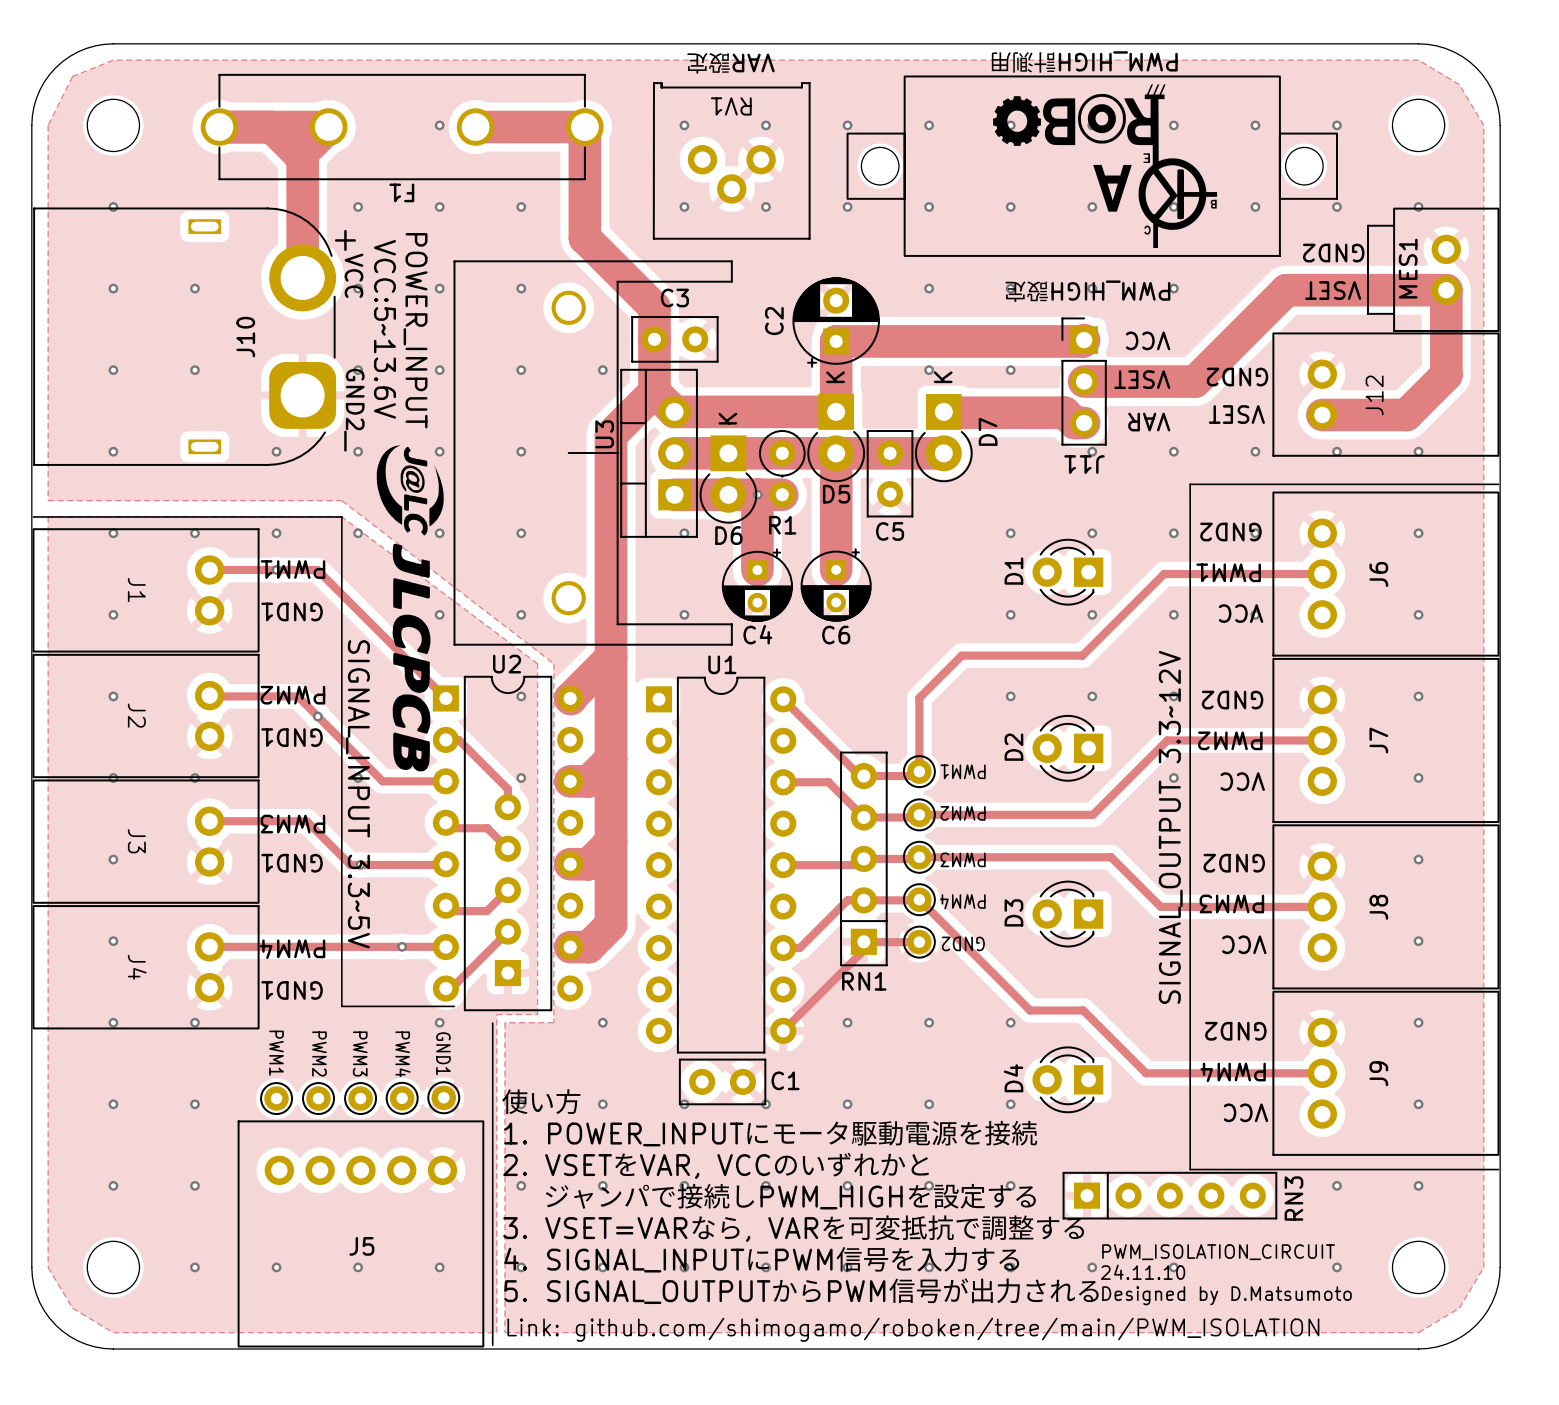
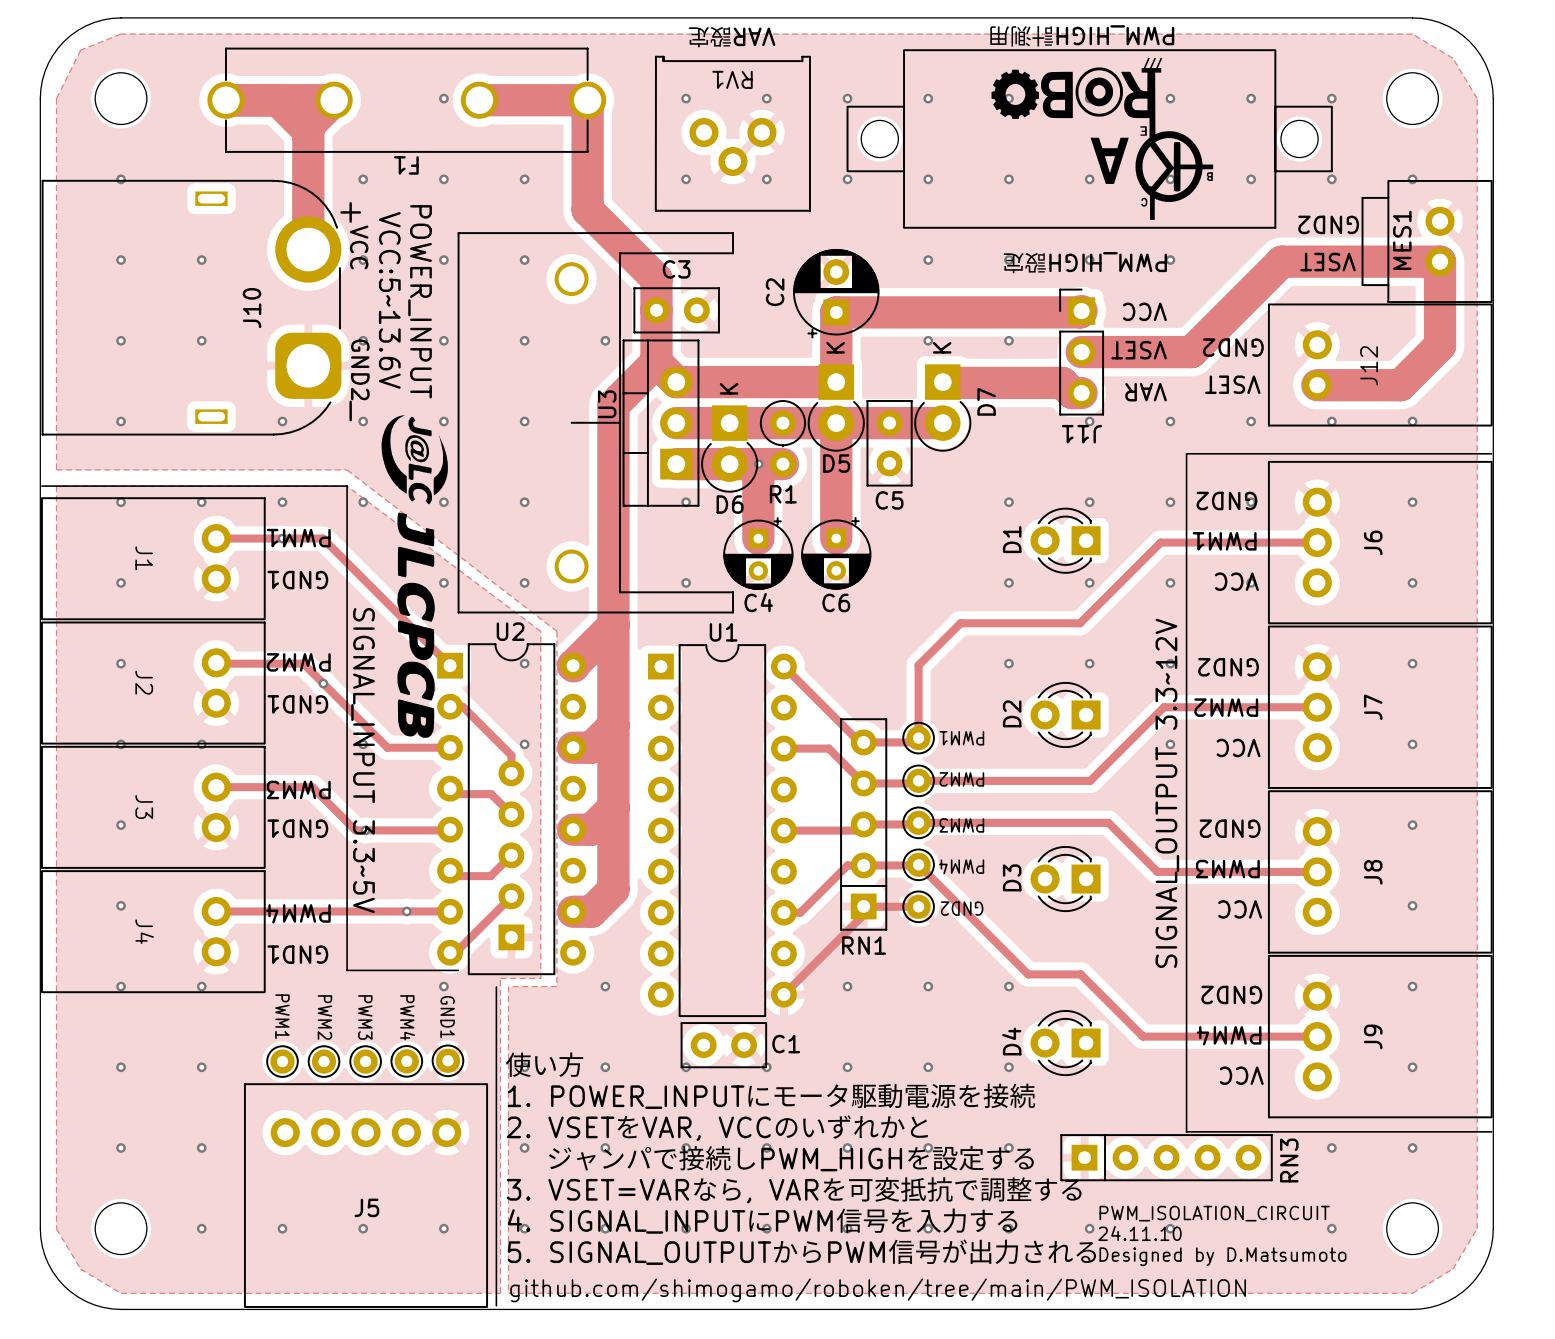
text: Link: github.com/shimogamo/roboken/tree/main/PWM_ISOLATION (913, 1329) -> github.com/shimogamo/roboken/tree/main/PWM_ISOLATION (878, 1290)

